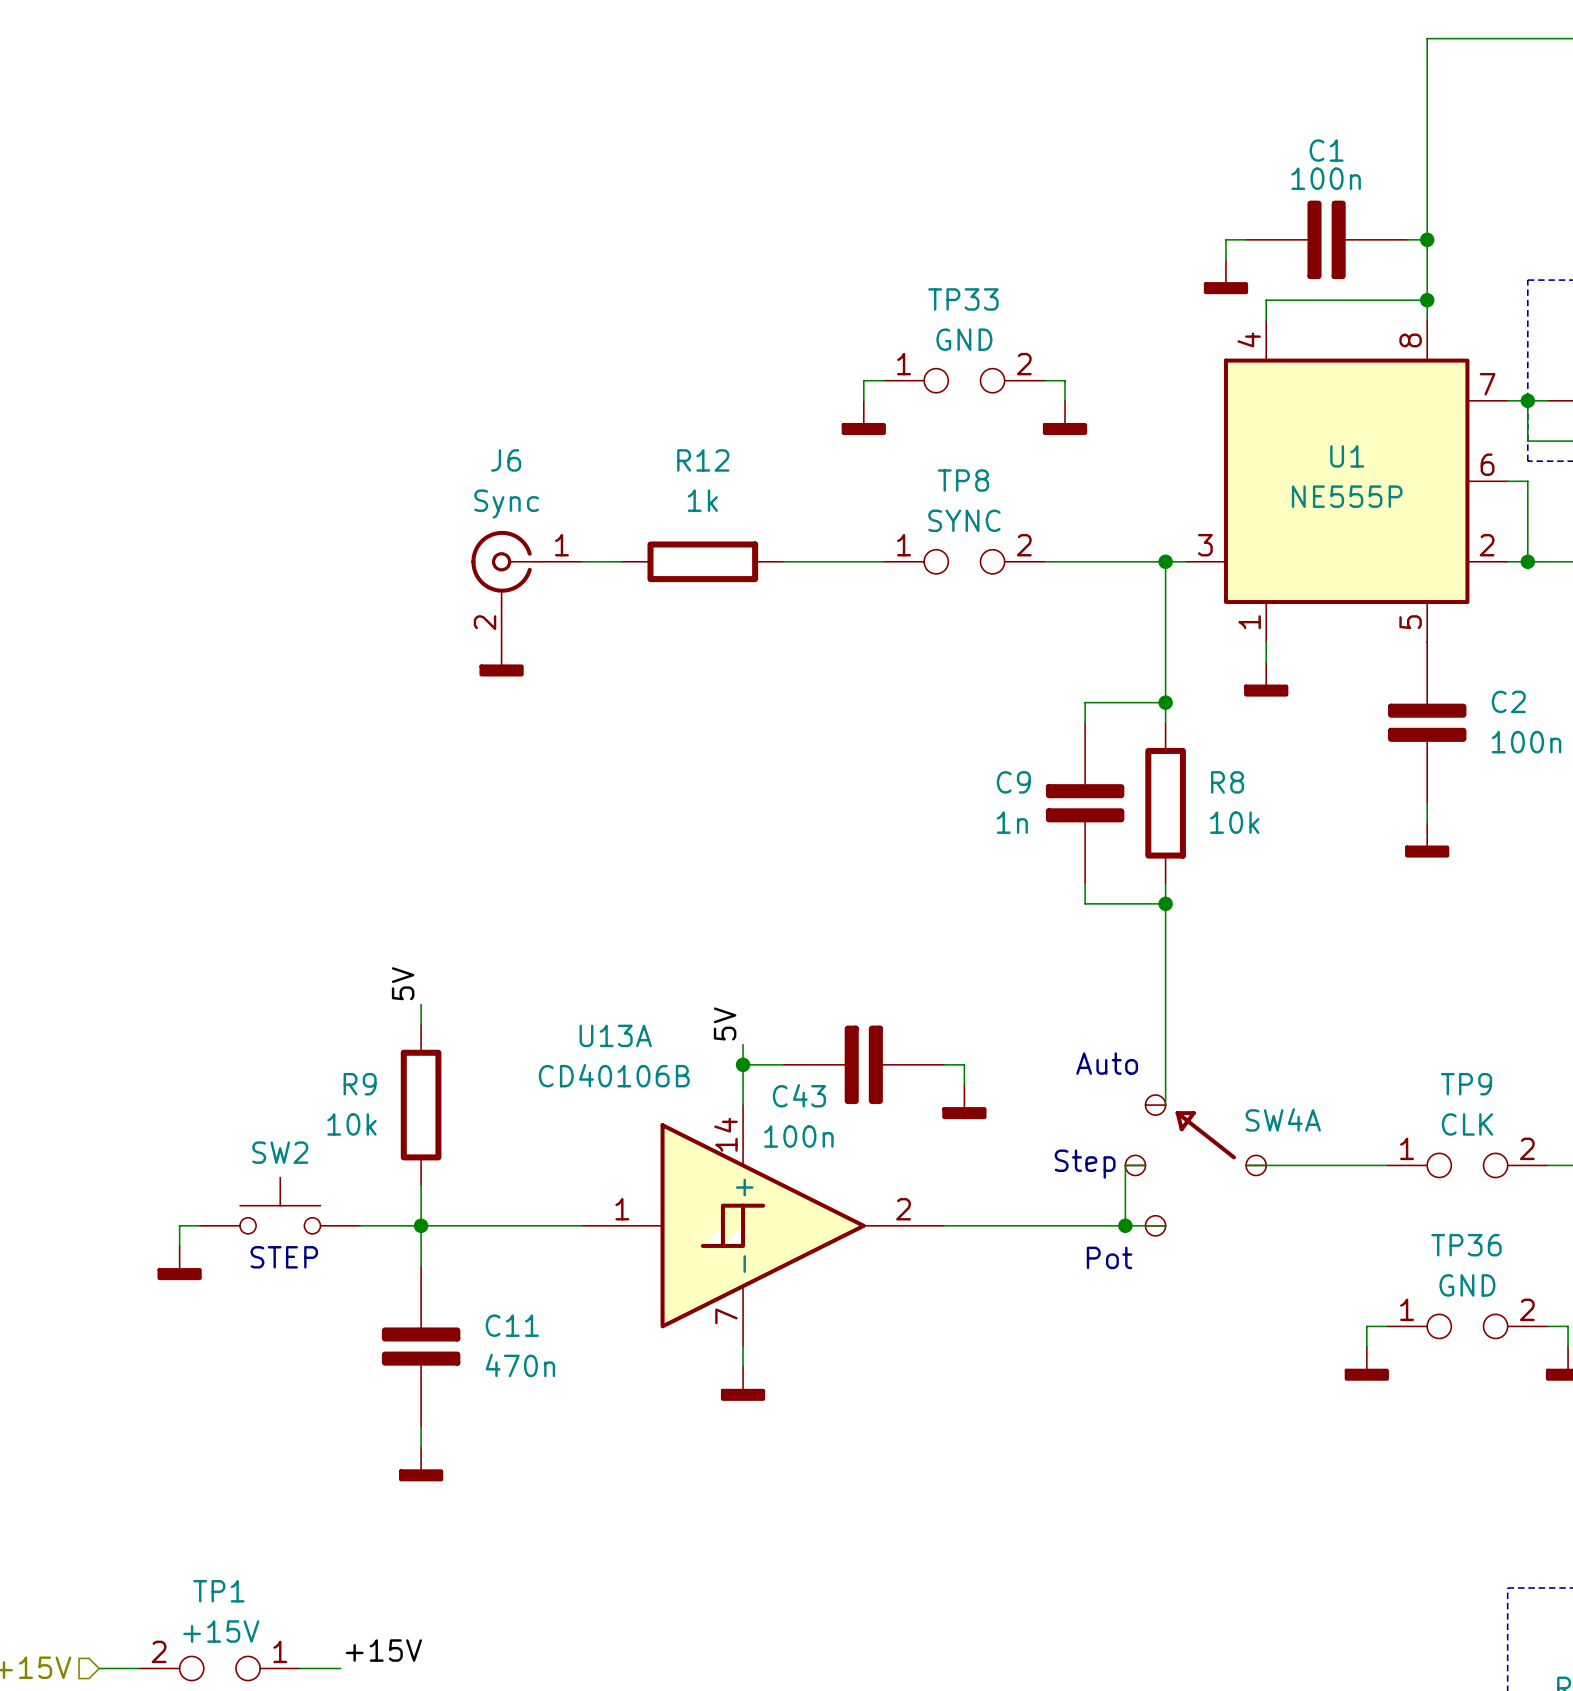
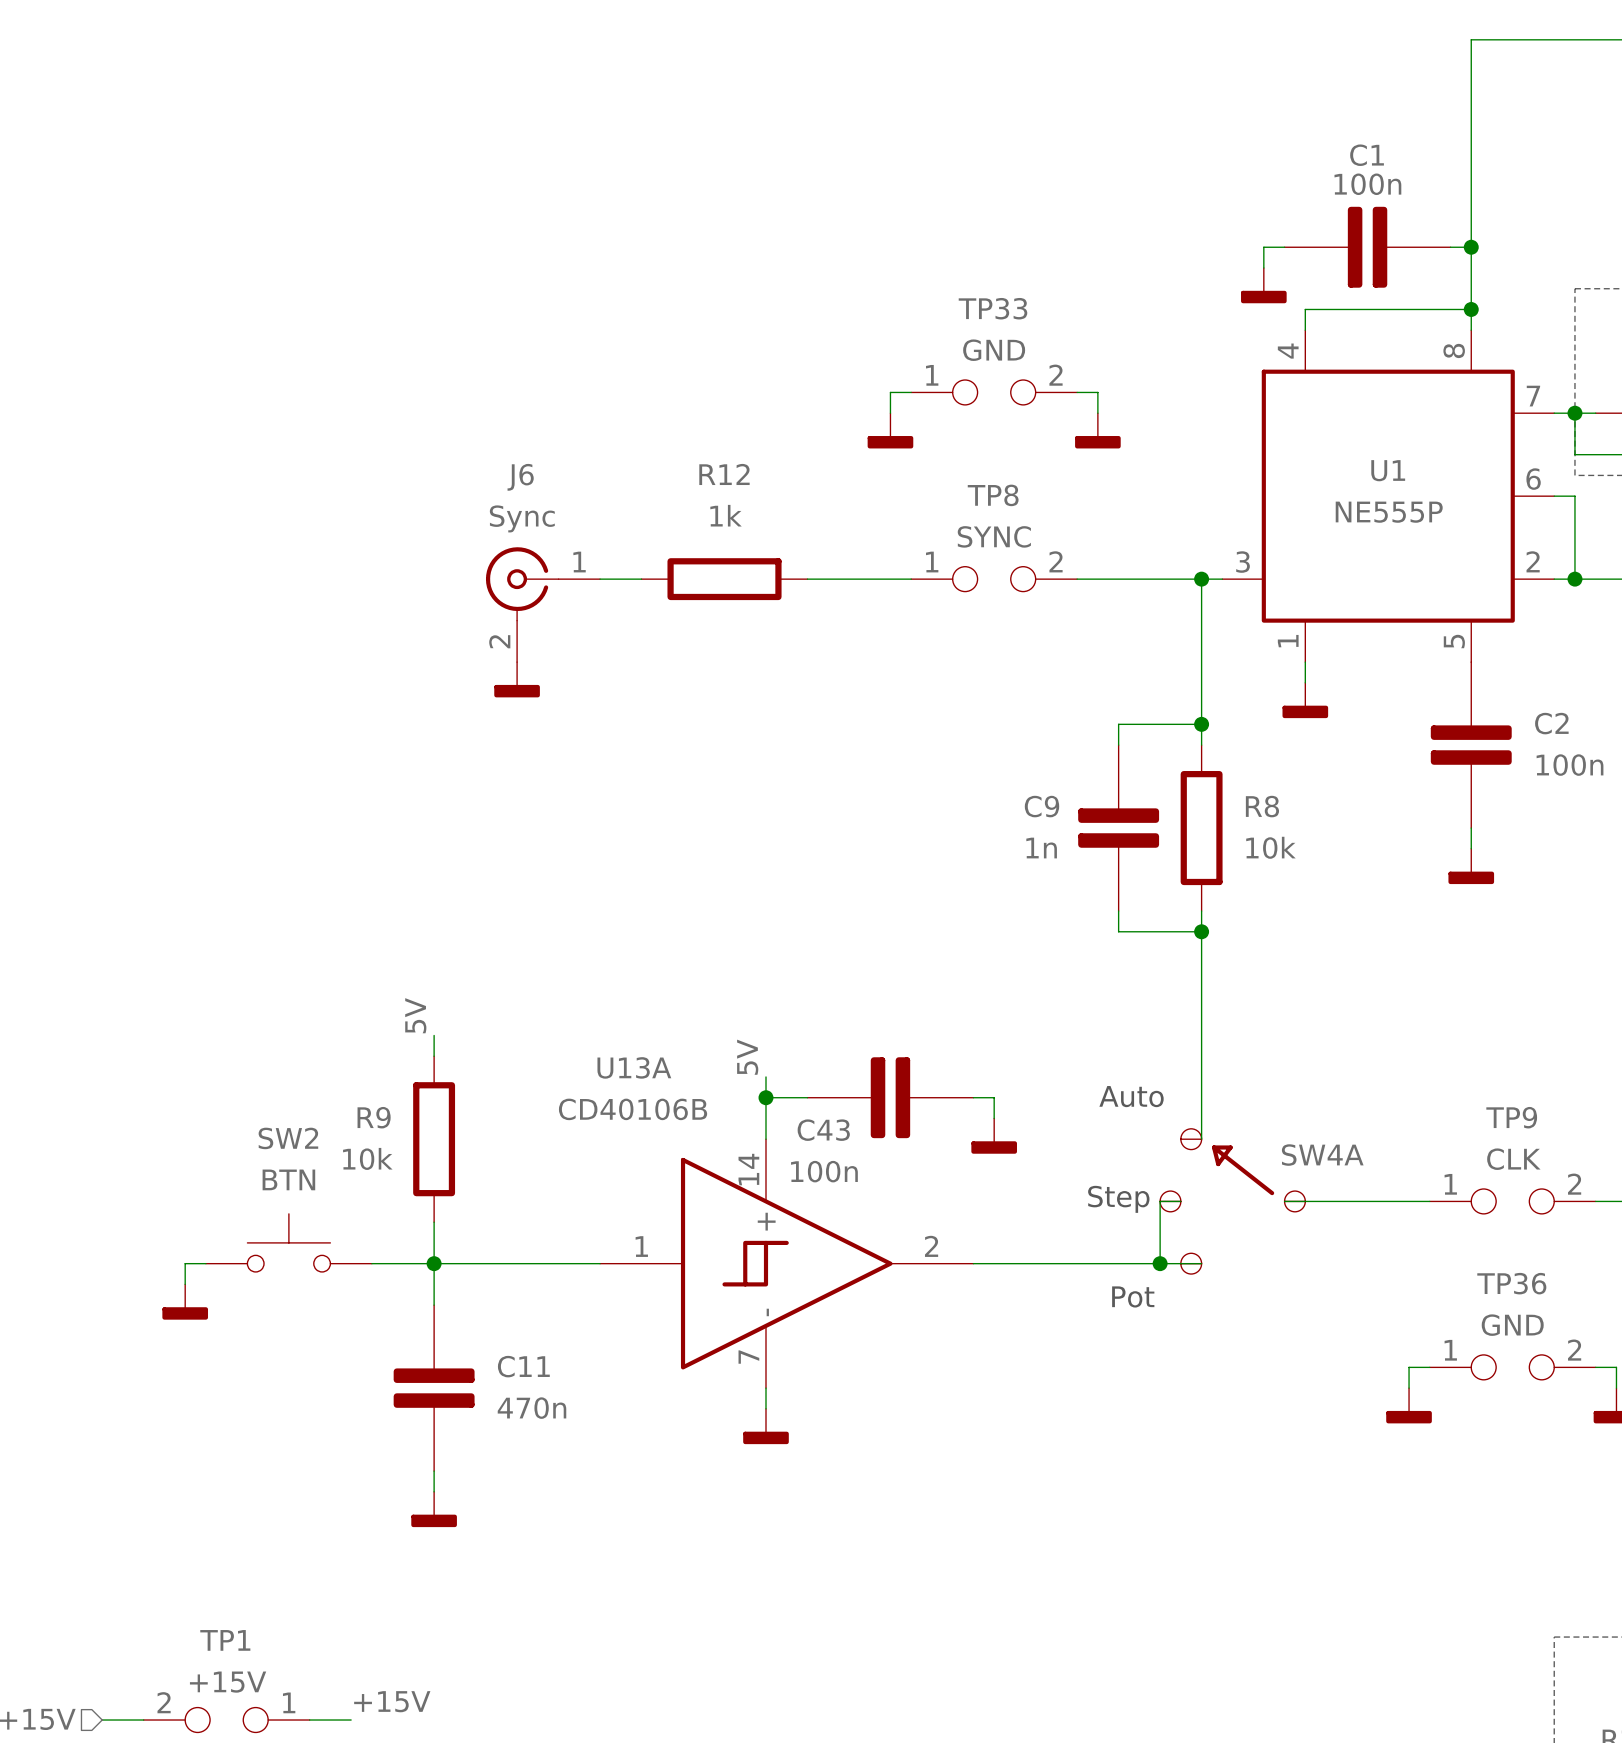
SW2 value: none -> BTN (288, 1179)
SW2 name position: SW2 (280, 1152) -> SW2 (288, 1138)
text: STEP (284, 1257) -> none

